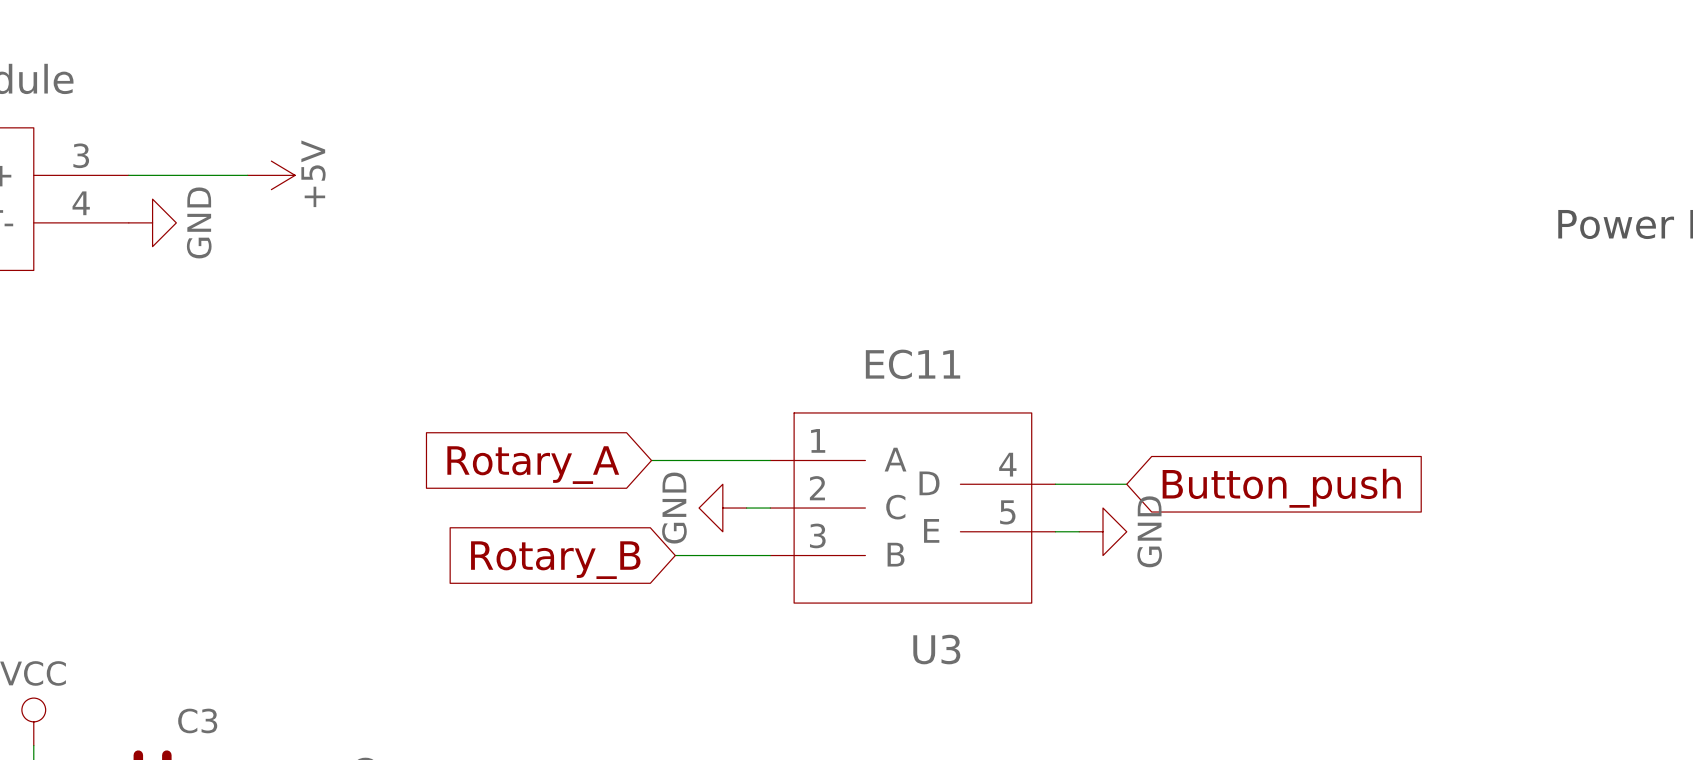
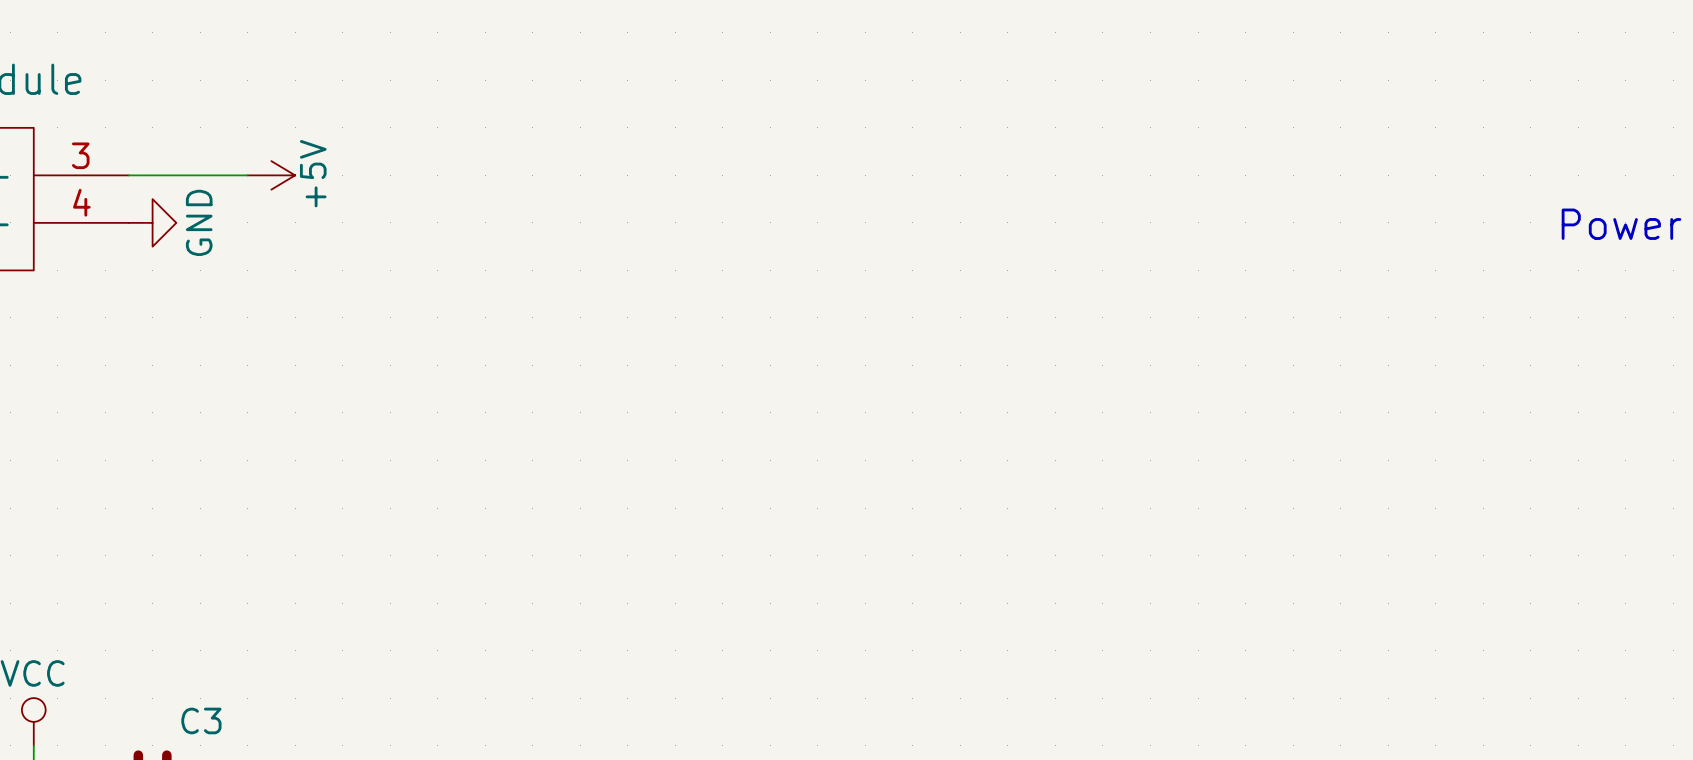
wire: (651, 460) (770, 460) -> none
global label: Rotary_A (533, 465) -> none
wire: (1055, 484) (1126, 484) -> none
global label: Button_push (1281, 488) -> none
power symbol: GND (722, 508) -> none
wire: (746, 508) (770, 508) -> none
U3: EC11 (912, 508) -> none
wire: (1055, 531) (1079, 531) -> none
power symbol: GND (1102, 531) -> none
wire: (675, 555) (770, 555) -> none
global label: Rotary_B (555, 560) -> none

